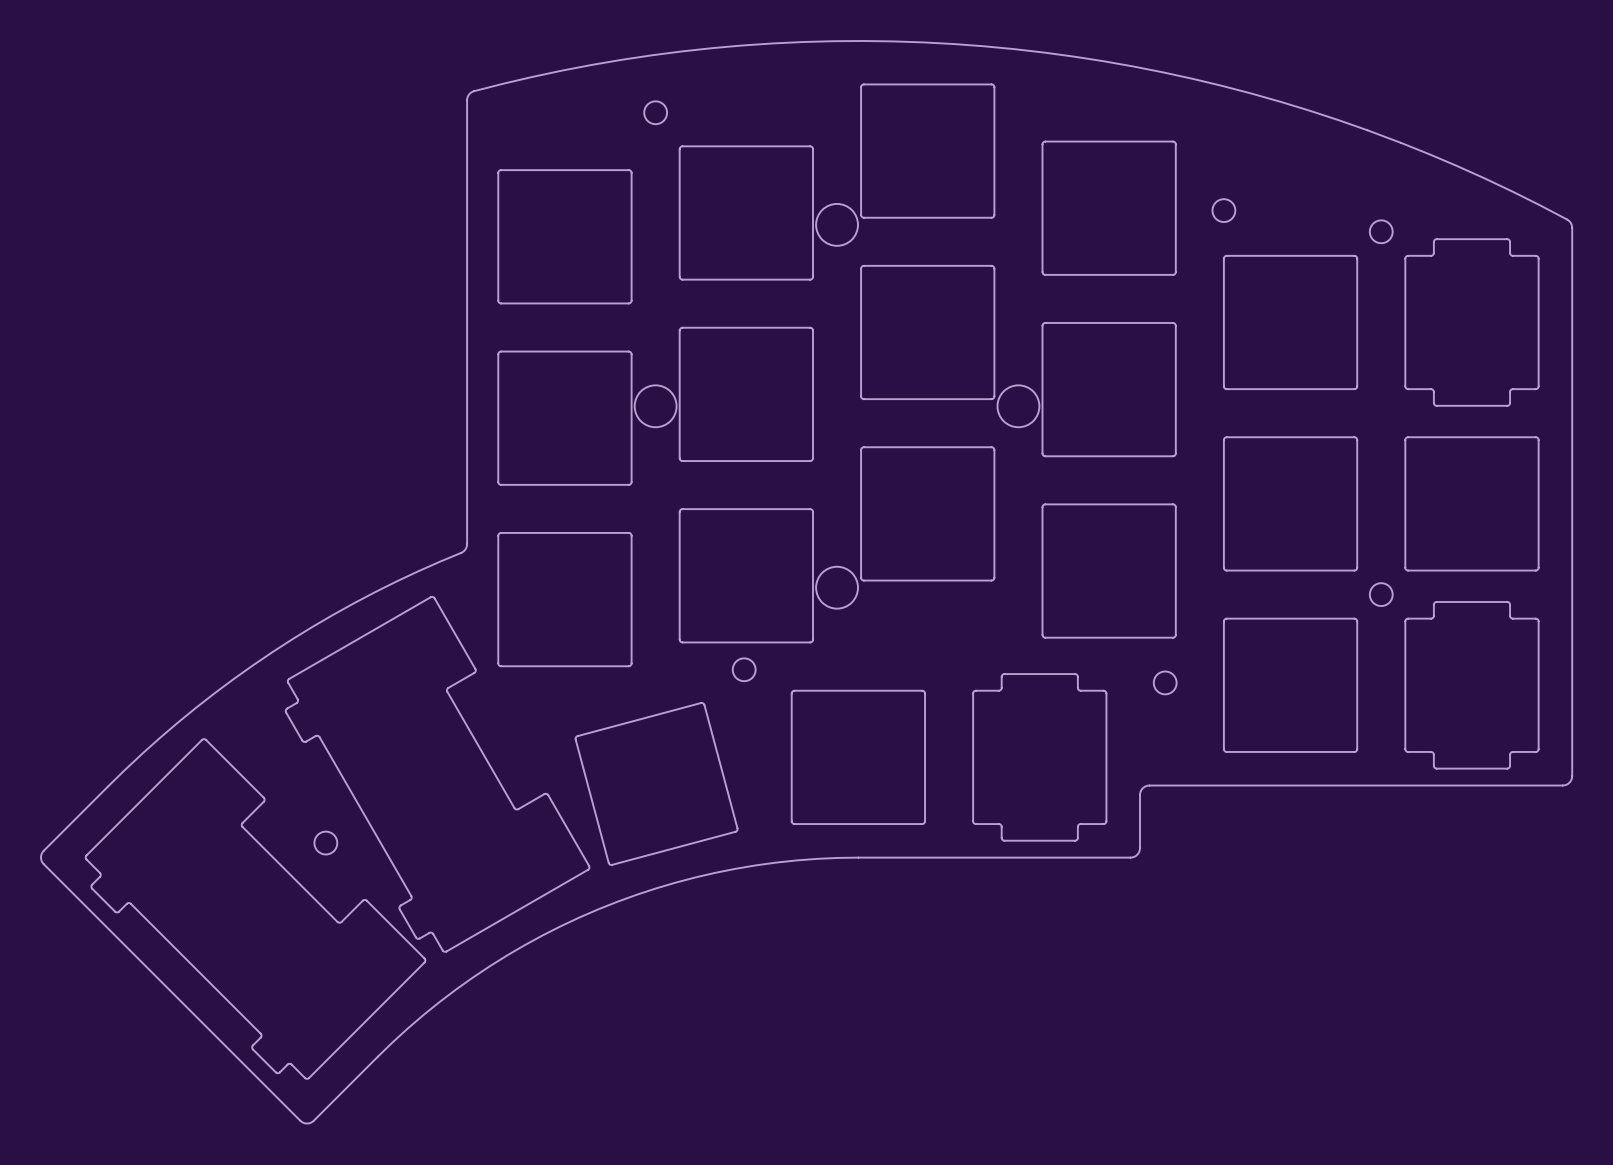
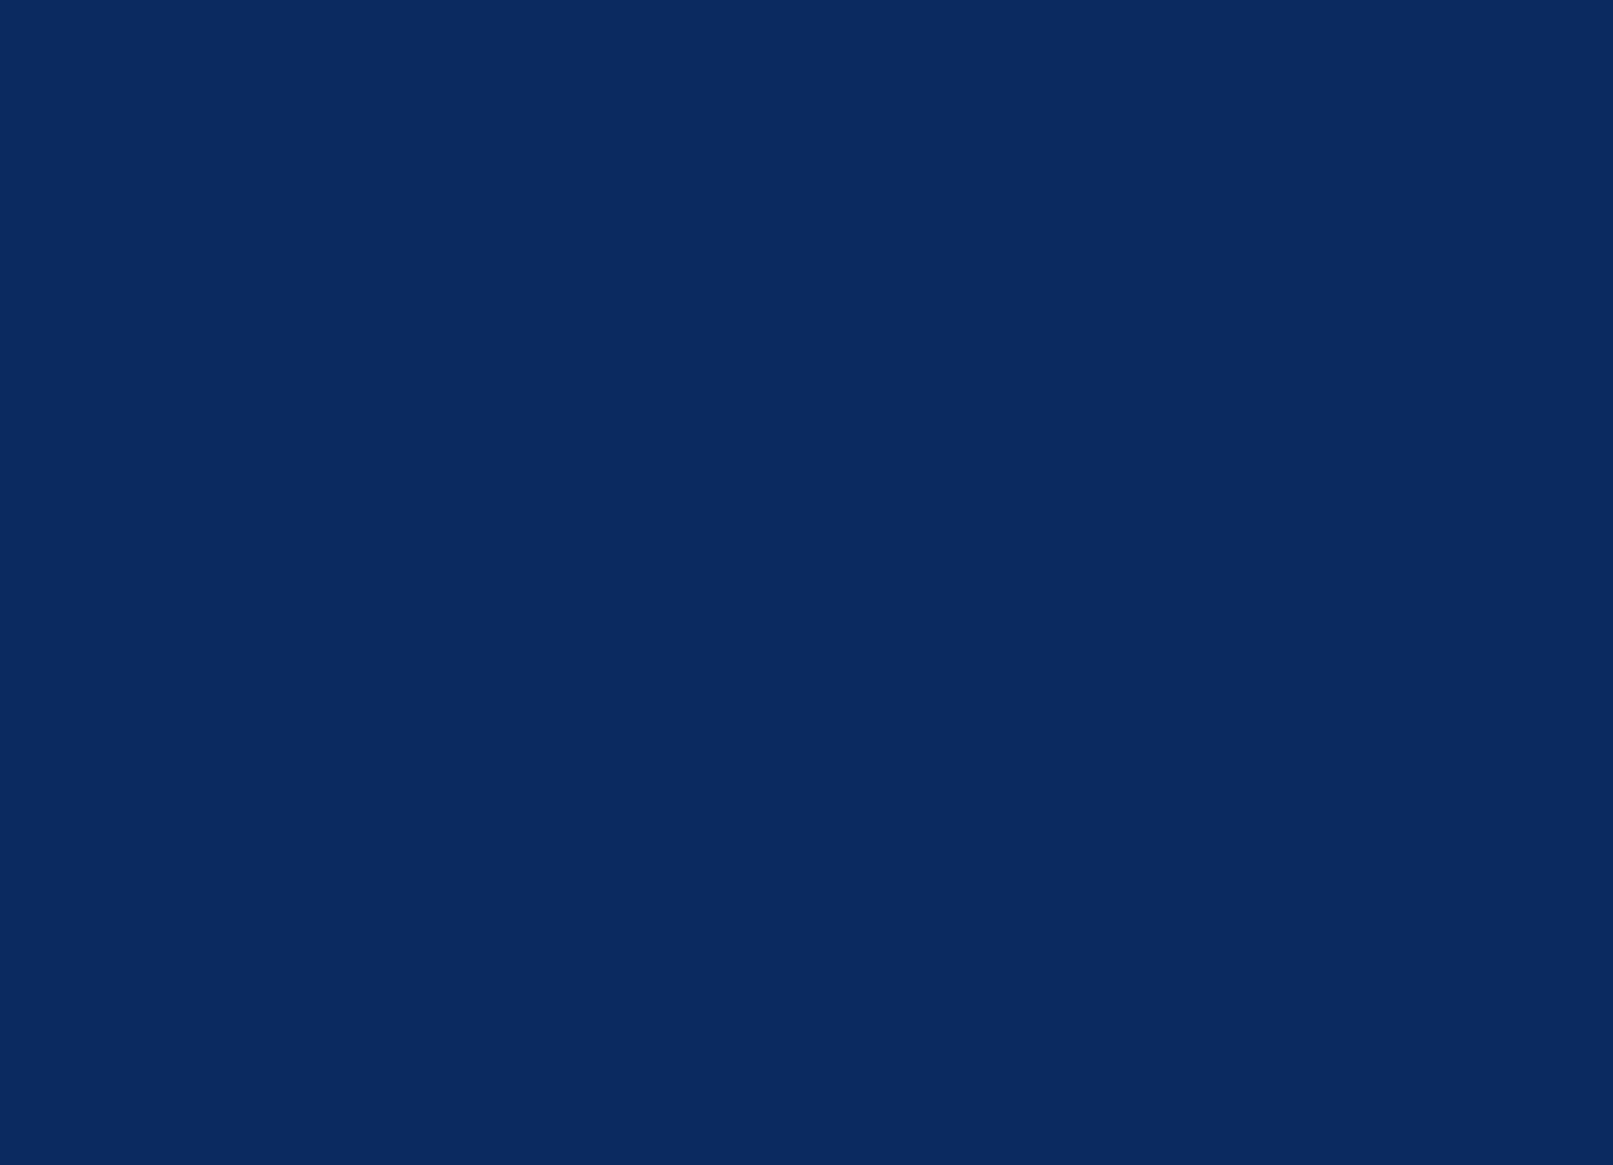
line: (863, 84) (993, 85) (993, 216) (861, 216) (861, 87) (863, 84) -> none
line: (474, 91) (562, 70) (622, 59) (682, 51) (772, 43) (833, 41) (923, 42) (1044, 52) (1163, 72) (1222, 86) (1310, 110) (1429, 154) (1512, 191) (1568, 220) (1572, 227) (1570, 781) (1562, 785) (1148, 785) (1143, 787) (1140, 792) (1139, 849) (1137, 854) (1132, 857) (817, 858) (735, 868) (675, 882) (617, 901) (579, 917) (524, 945) (489, 966) (455, 989) (407, 1028) (312, 1121) (308, 1123) (302, 1122) (43, 864) (41, 856) (43, 850) (142, 753) (196, 707) (233, 678) (272, 651) (333, 614) (396, 581) (462, 552) (466, 548) (467, 100) (469, 94) (474, 91) -> none
drawing: [643, 100, 669, 126] -> none
line: (1045, 141) (1174, 142) (1174, 274) (1043, 274) (1042, 144) (1045, 141) -> none
line: (682, 146) (812, 147) (812, 278) (680, 278) (679, 149) (682, 146) -> none
line: (501, 170) (630, 170) (630, 302) (499, 302) (498, 172) (501, 170) -> none
drawing: [1211, 198, 1237, 223] -> none
drawing: [815, 202, 859, 247] -> none
drawing: [1368, 219, 1394, 245] -> none
line: (1436, 239) (1507, 239) (1509, 241) (1511, 255) (1538, 257) (1538, 387) (1536, 389) (1511, 389) (1508, 405) (1436, 405) (1433, 403) (1432, 389) (1407, 389) (1405, 387) (1405, 258) (1407, 255) (1432, 255) (1433, 241) (1436, 239) -> none
line: (1226, 255) (1356, 256) (1356, 388) (1224, 388) (1223, 258) (1226, 255) -> none
line: (863, 265) (993, 266) (993, 398) (861, 398) (861, 268) (863, 265) -> none
line: (1045, 322) (1174, 323) (1174, 455) (1043, 455) (1042, 325) (1045, 322) -> none
line: (682, 327) (812, 328) (812, 460) (680, 460) (679, 330) (682, 327) -> none
line: (501, 351) (630, 352) (630, 484) (499, 484) (498, 354) (501, 351) -> none
drawing: [633, 384, 678, 429] -> none
drawing: [996, 384, 1041, 429] -> none
line: (1226, 437) (1356, 438) (1356, 569) (1224, 569) (1223, 440) (1226, 437) -> none
line: (1408, 437) (1537, 438) (1537, 569) (1406, 569) (1405, 440) (1408, 437) -> none
line: (863, 447) (993, 448) (993, 579) (861, 579) (861, 450) (863, 447) -> none
line: (1045, 504) (1174, 505) (1174, 636) (1043, 636) (1042, 507) (1045, 504) -> none
line: (682, 509) (812, 509) (812, 641) (680, 641) (679, 511) (682, 509) -> none
line: (501, 532) (630, 533) (630, 665) (499, 665) (498, 535) (501, 532) -> none
drawing: [815, 565, 859, 610] -> none
drawing: [1368, 582, 1394, 607] -> none
line: (430, 597) (288, 679) (288, 682) (298, 701) (285, 711) (303, 741) (316, 735) (319, 736) (411, 896) (410, 899) (399, 908) (415, 937) (419, 938) (431, 932) (445, 951) (589, 867) (547, 794) (544, 794) (518, 809) (514, 808) (447, 691) (448, 688) (474, 672) (475, 669) (434, 598) (430, 597) -> none
line: (1436, 601) (1507, 602) (1509, 604) (1511, 618) (1538, 620) (1538, 749) (1536, 751) (1511, 752) (1508, 768) (1436, 768) (1433, 766) (1432, 752) (1407, 751) (1405, 750) (1405, 620) (1407, 618) (1432, 618) (1433, 604) (1436, 601) -> none
line: (1226, 618) (1356, 619) (1356, 751) (1224, 751) (1223, 621) (1226, 618) -> none
drawing: [731, 657, 757, 683] -> none
drawing: [1152, 670, 1178, 696] -> none
line: (1004, 674) (1075, 674) (1077, 676) (1079, 690) (1106, 692) (1106, 821) (1103, 824) (1079, 824) (1076, 840) (1004, 840) (1001, 838) (1000, 824) (975, 824) (973, 822) (973, 692) (975, 690) (1000, 690) (1001, 676) (1004, 674) -> none
line: (794, 690) (924, 691) (924, 823) (792, 823) (791, 693) (794, 690) -> none
line: (700, 703) (575, 737) (610, 864) (737, 830) (704, 705) (700, 703) -> none
line: (202, 739) (86, 855) (86, 859) (100, 874) (91, 887) (116, 912) (127, 903) (130, 903) (260, 1033) (261, 1037) (252, 1048) (276, 1072) (279, 1072) (290, 1063) (307, 1078) (424, 962) (425, 959) (366, 900) (363, 900) (341, 922) (337, 921) (242, 826) (242, 823) (263, 801) (264, 798) (206, 739) (202, 739) -> none
drawing: [313, 830, 339, 856] -> none

